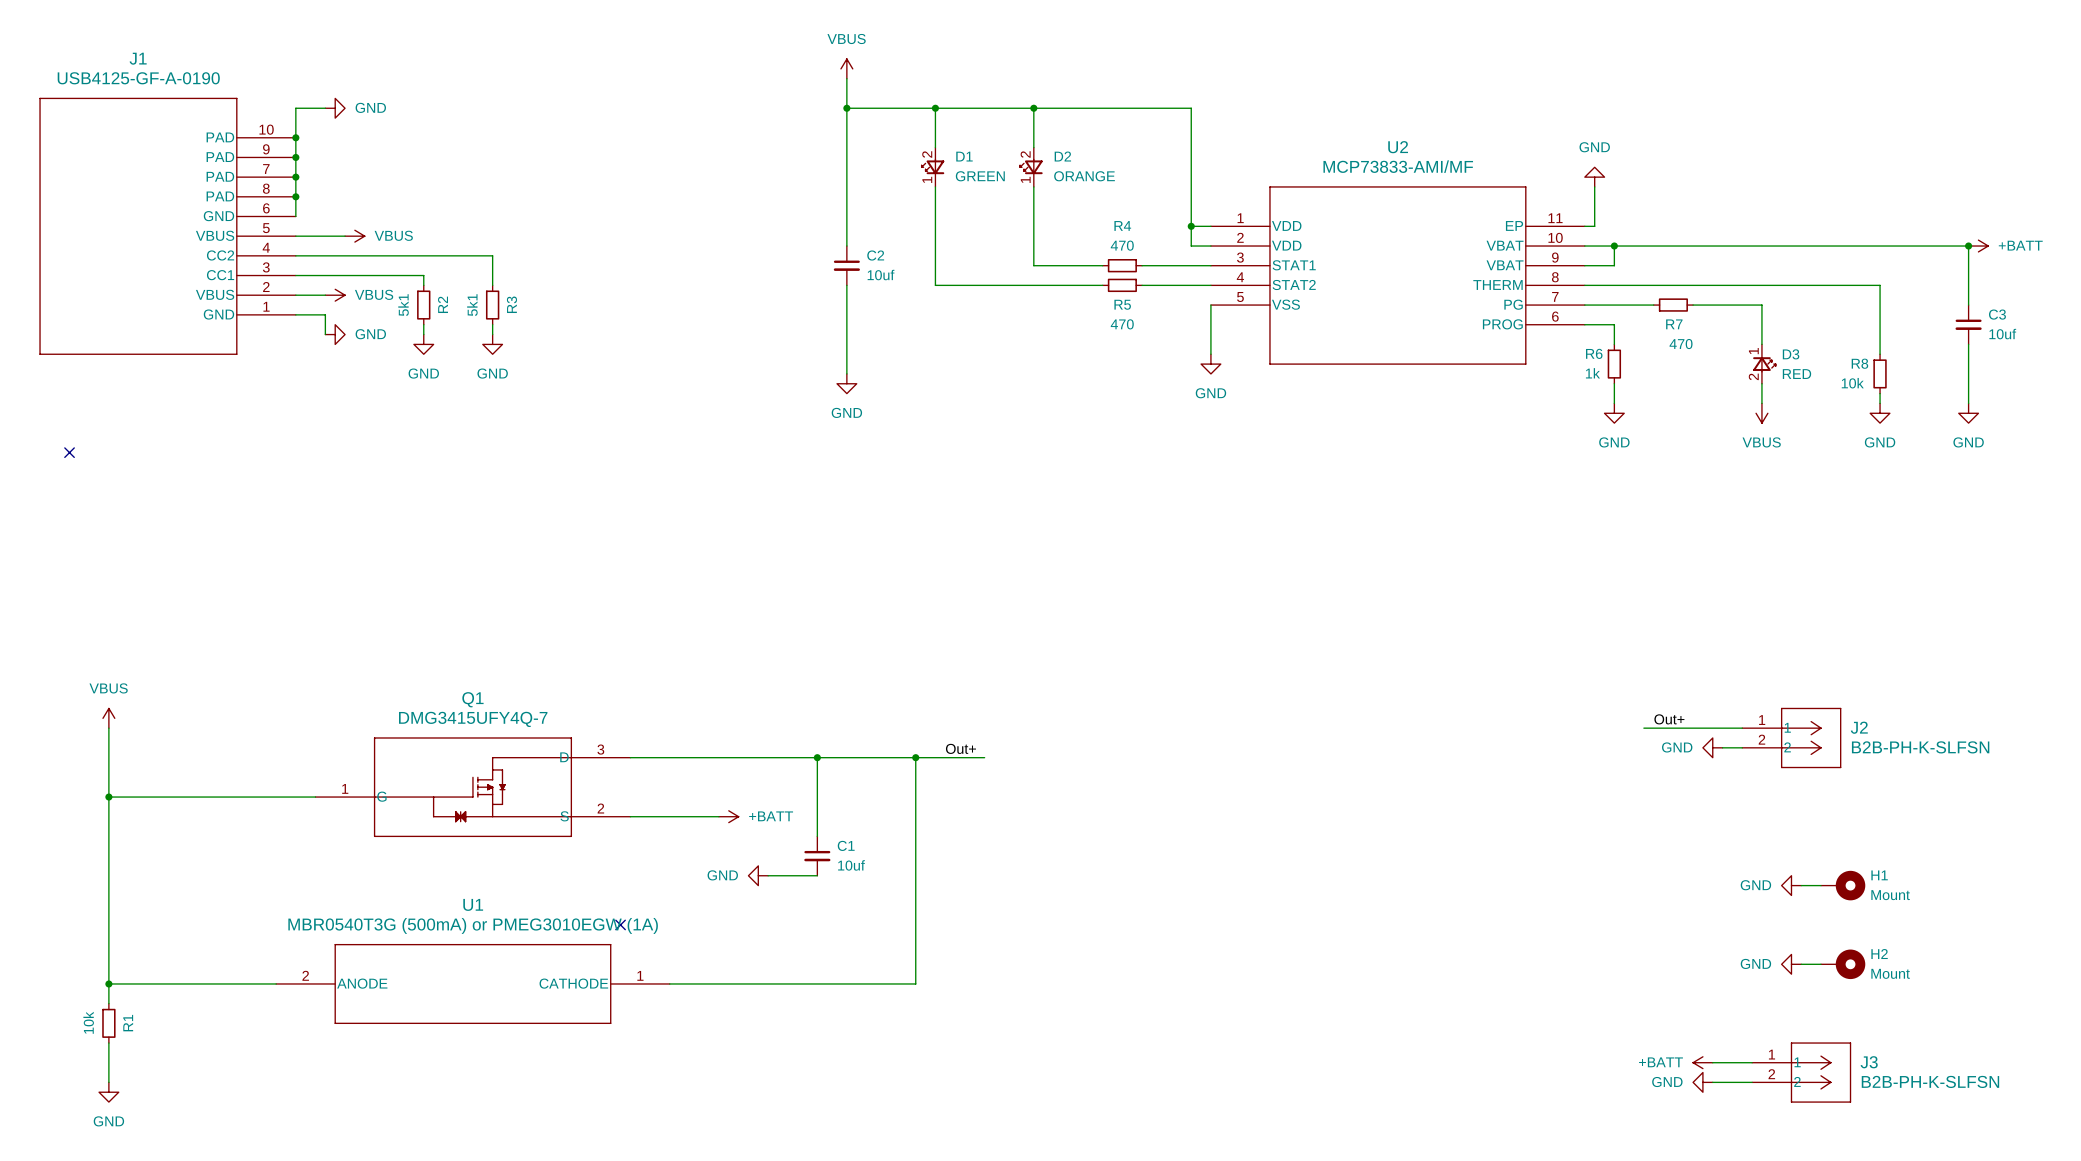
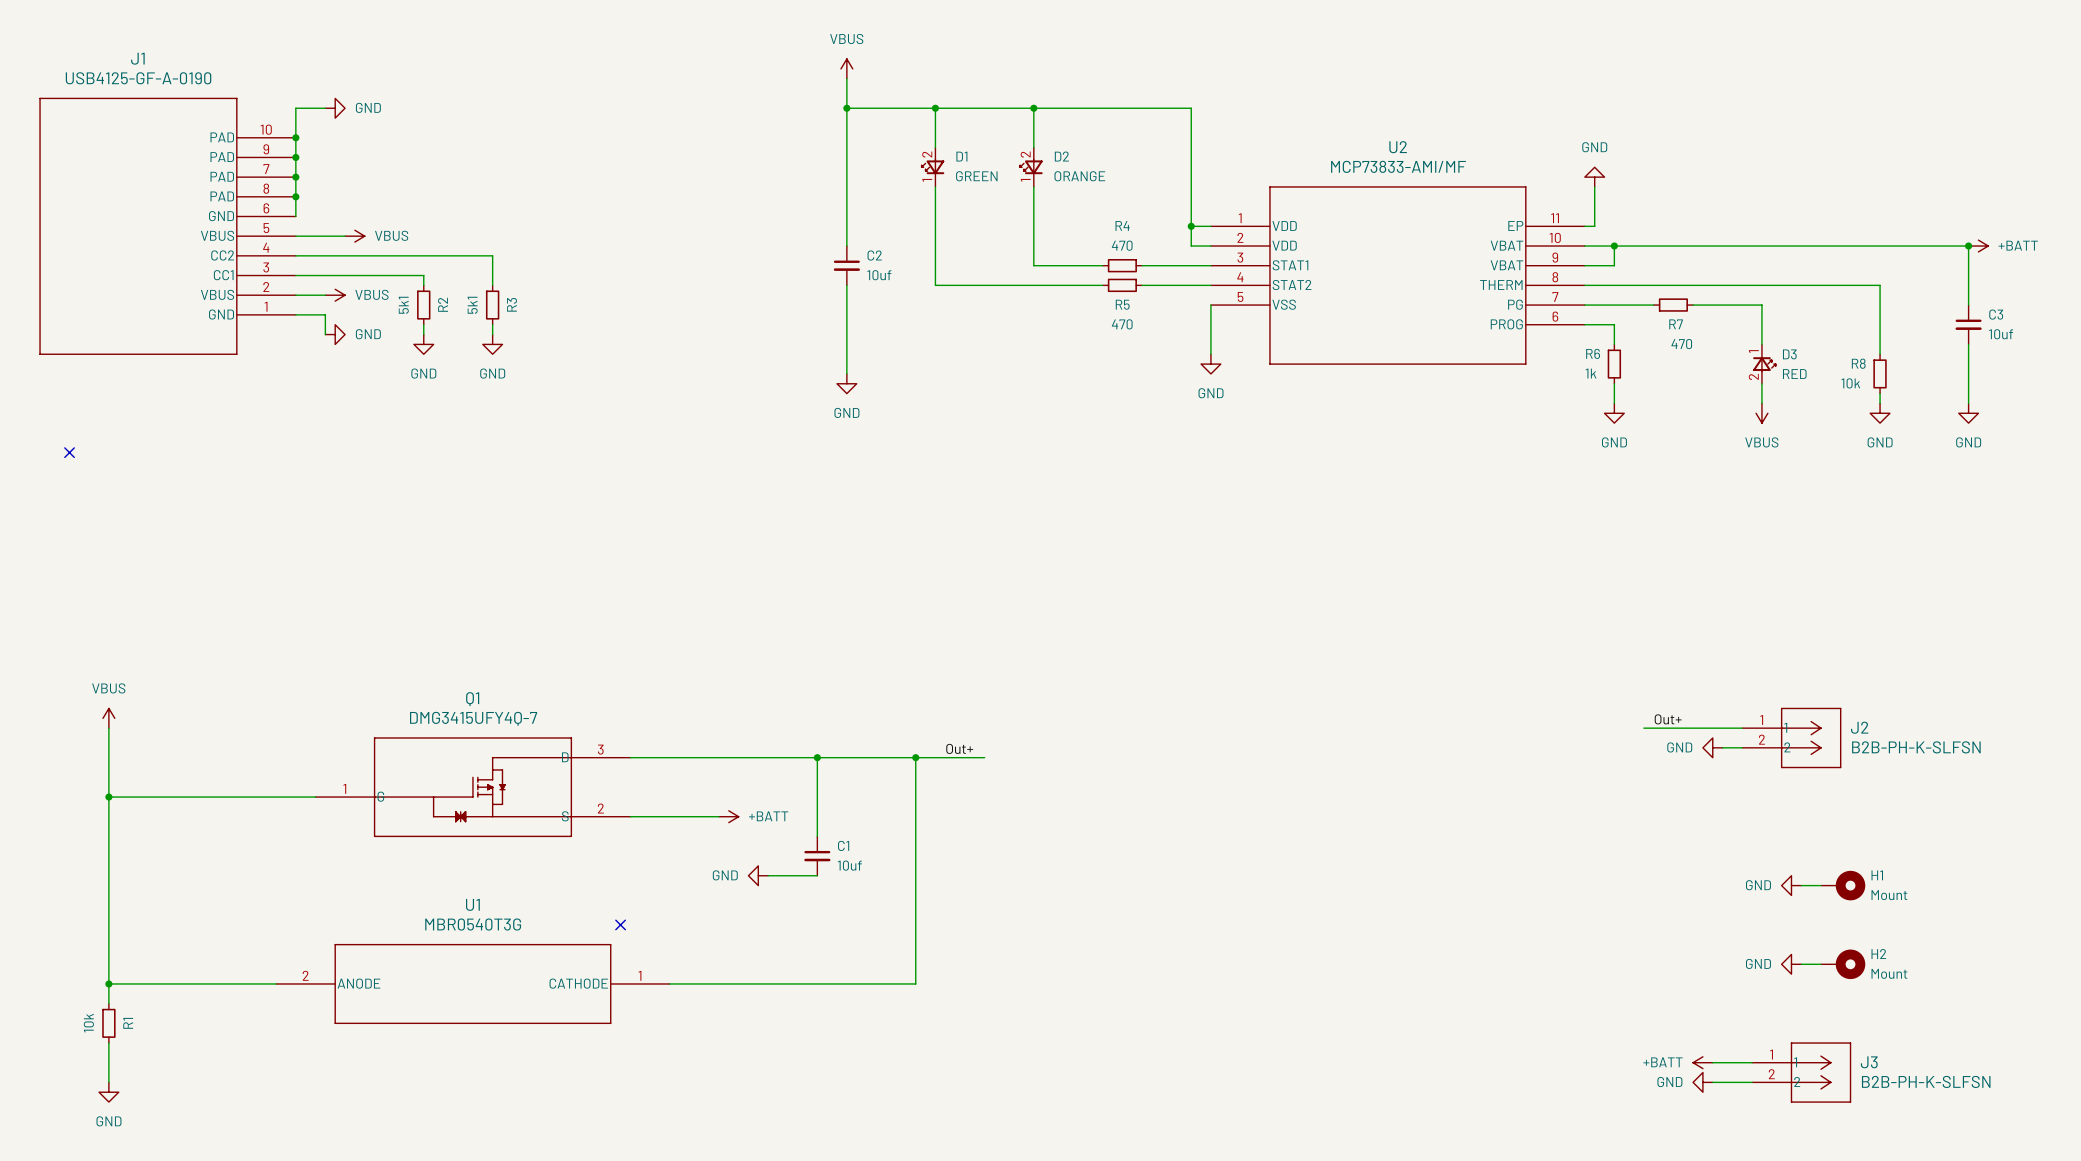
U1 value: MBR0540T3G (500mA) or PMEG3010EGW (1A) (473, 925) -> MBR0540T3G (473, 924)

